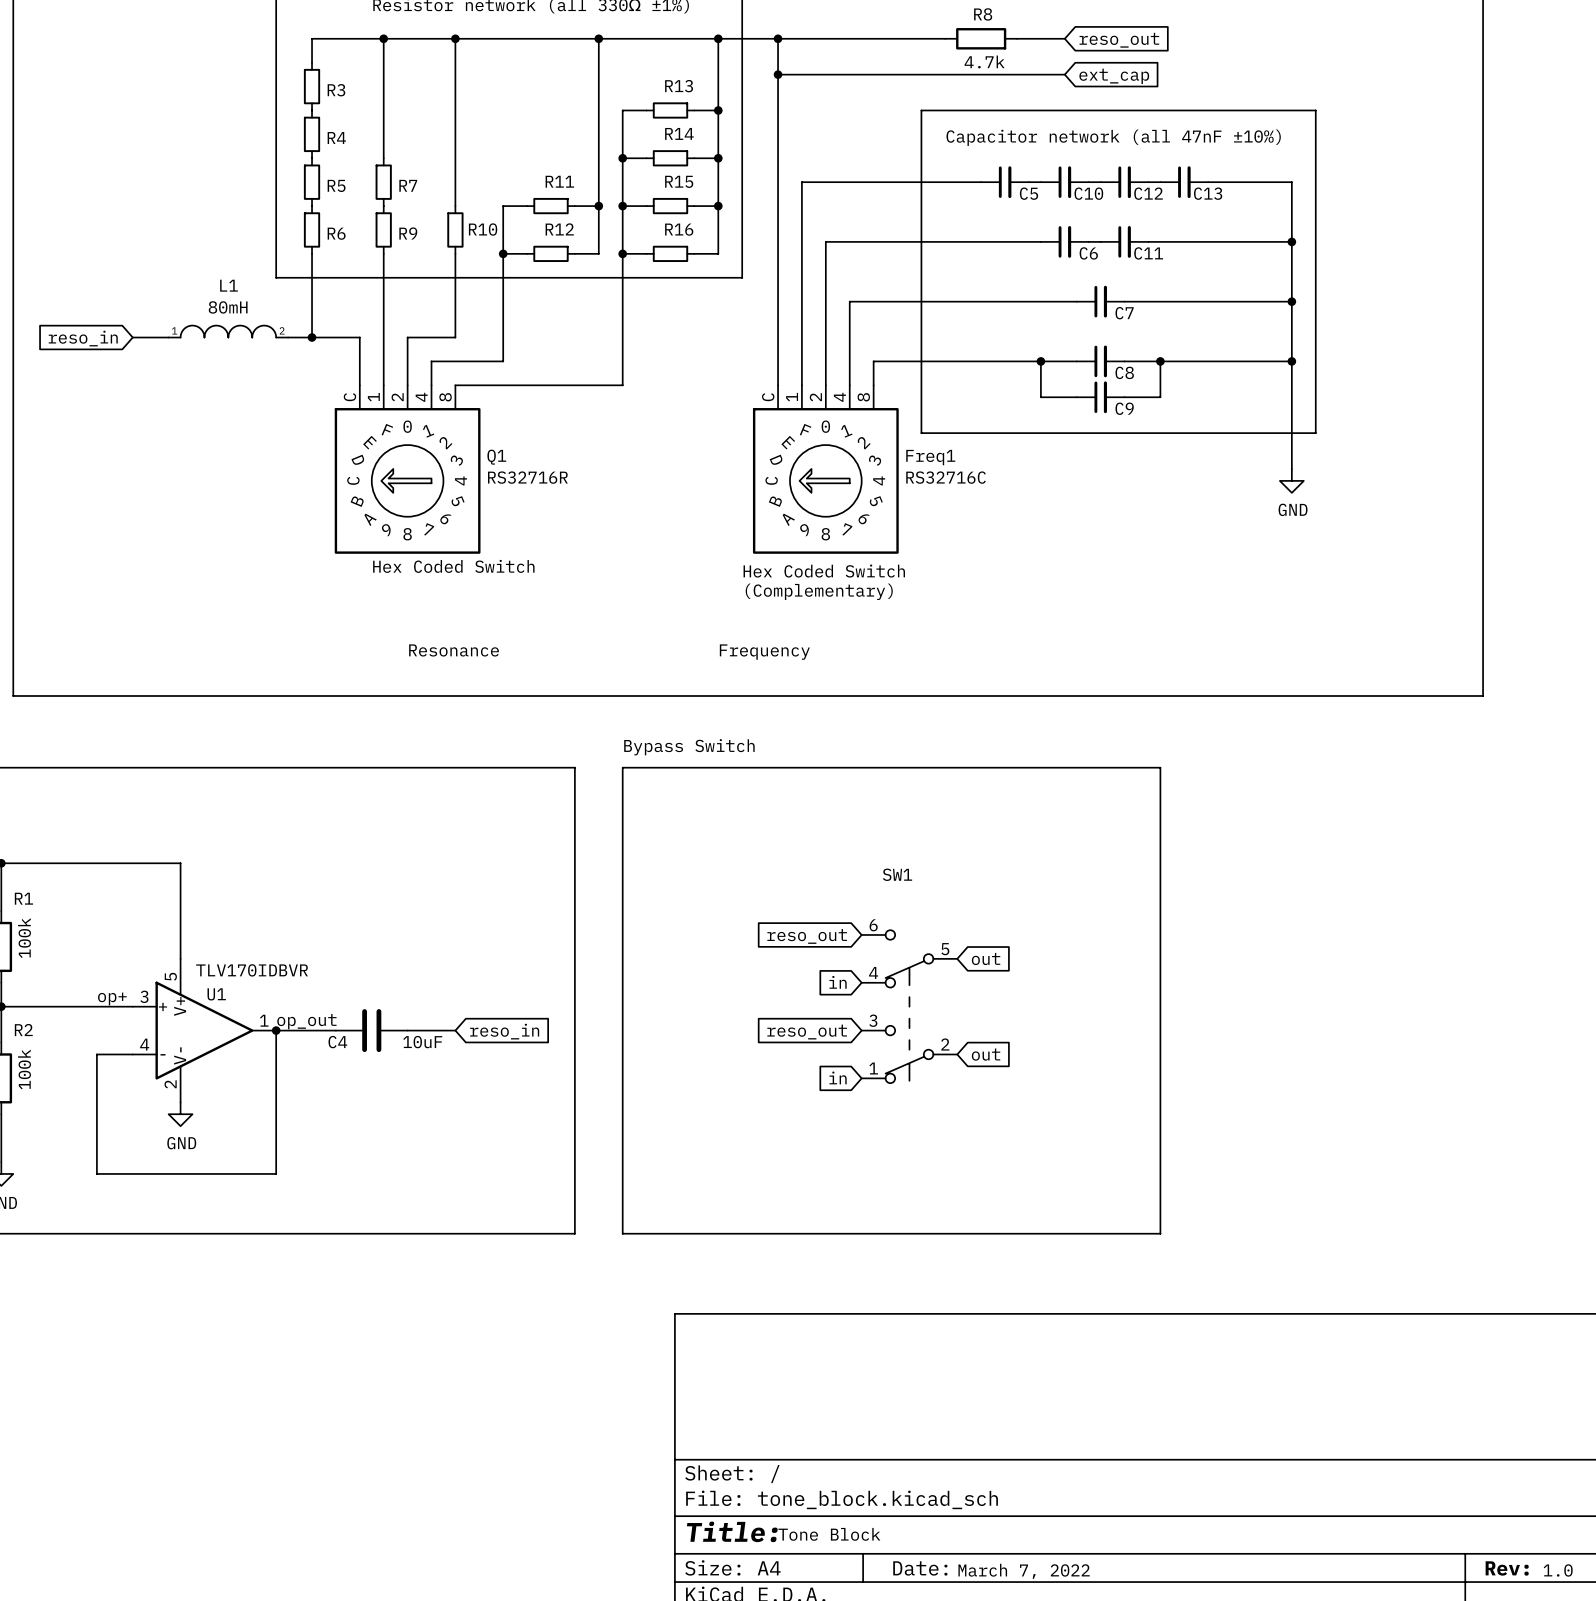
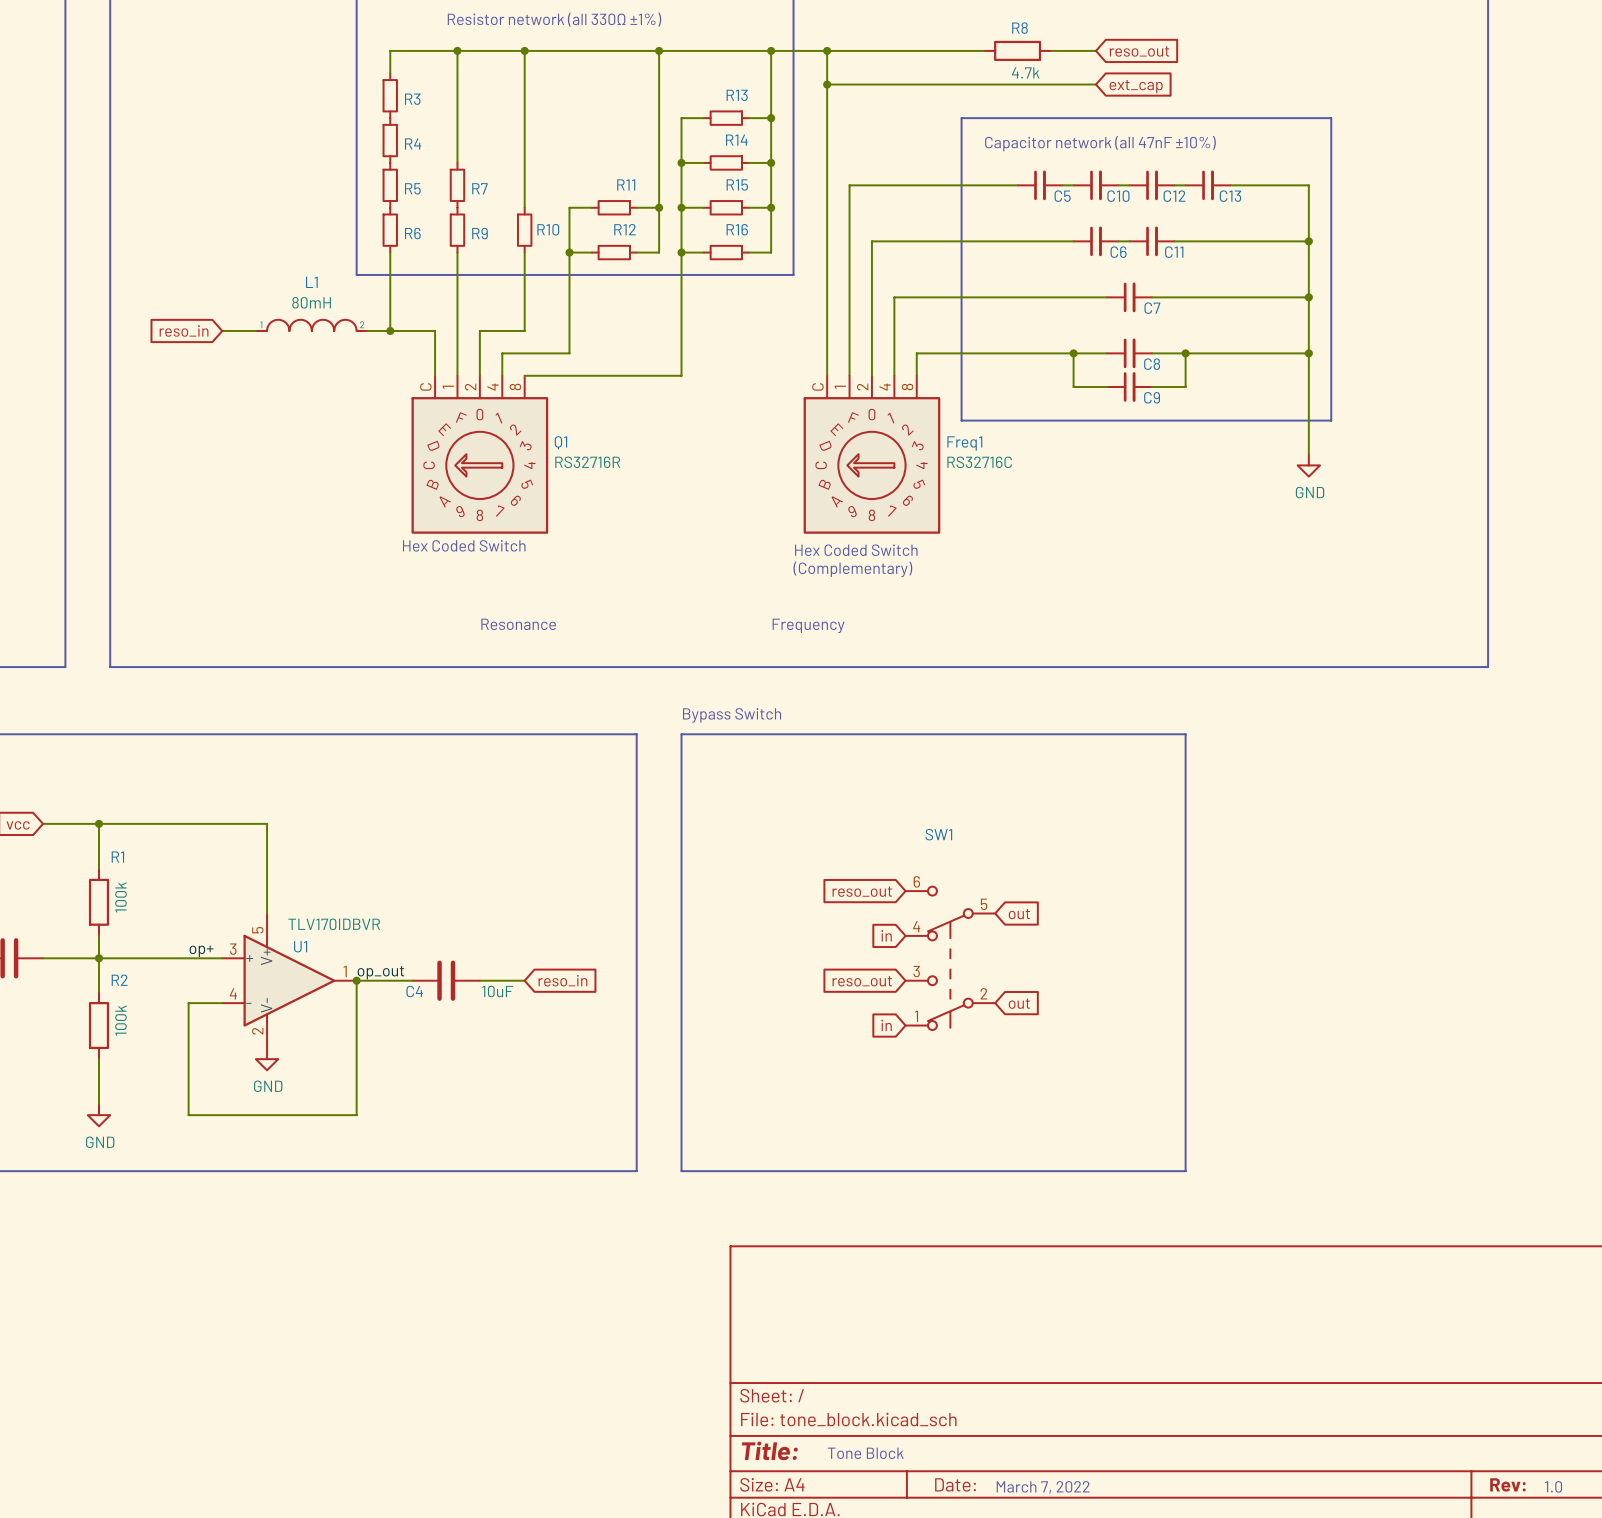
text position: Hex Coded Switch (453, 566) -> Hex Coded Switch (464, 545)

